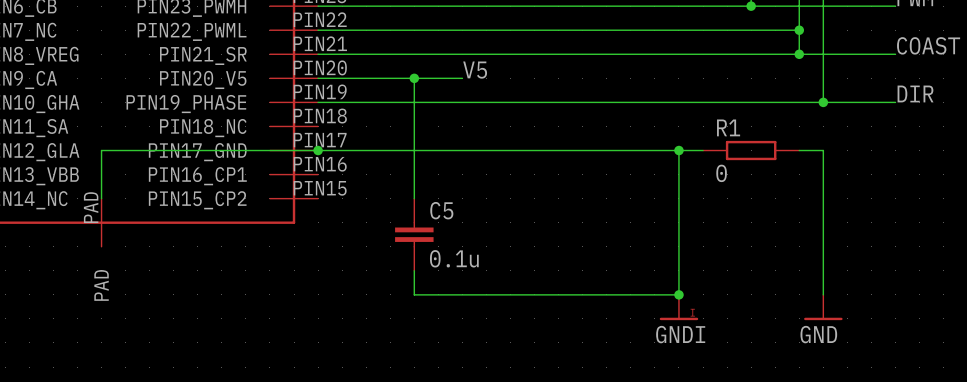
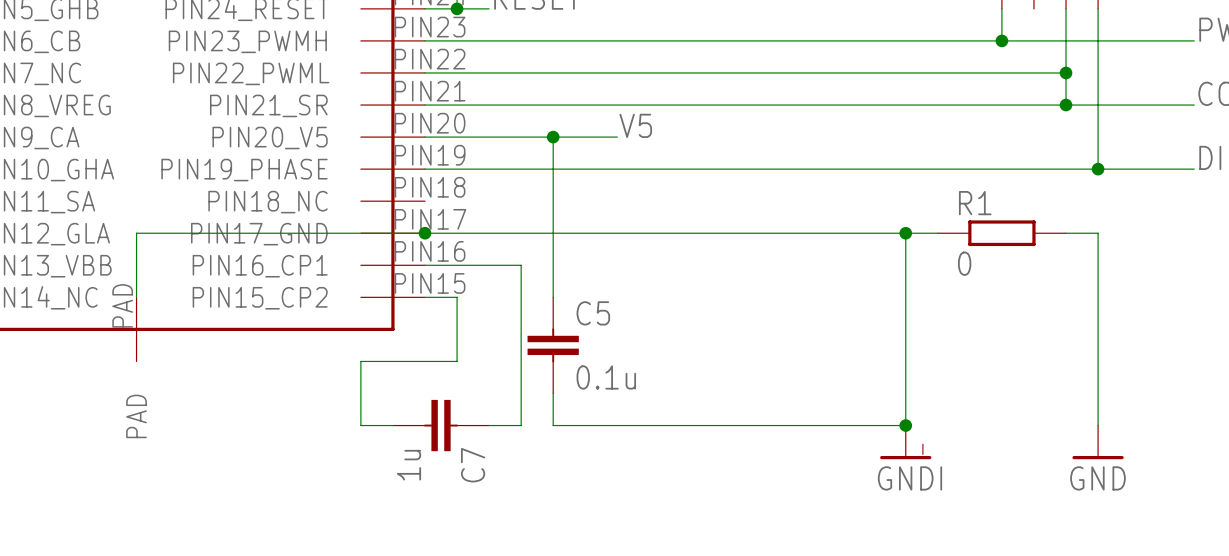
wire: none -> (425, 265) (521, 265) (521, 425) (489, 425)
wire: none -> (425, 297) (457, 297) (457, 361) (360, 361) (360, 425) (392, 425)
C7: none -> 1u (441, 425)

